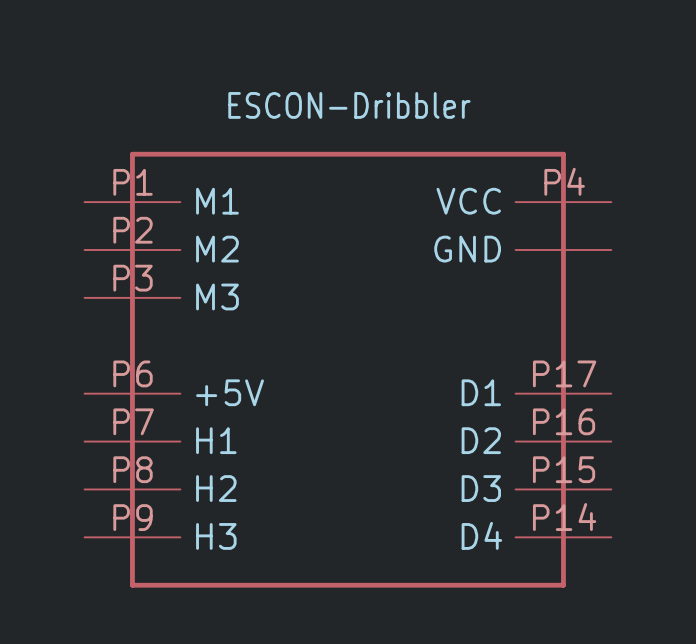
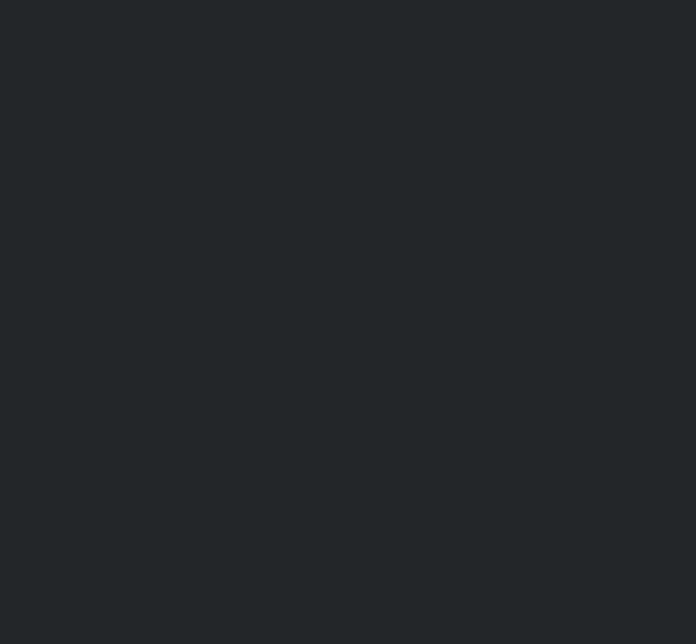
ESCON-Dribbler: (347, 369) -> none

